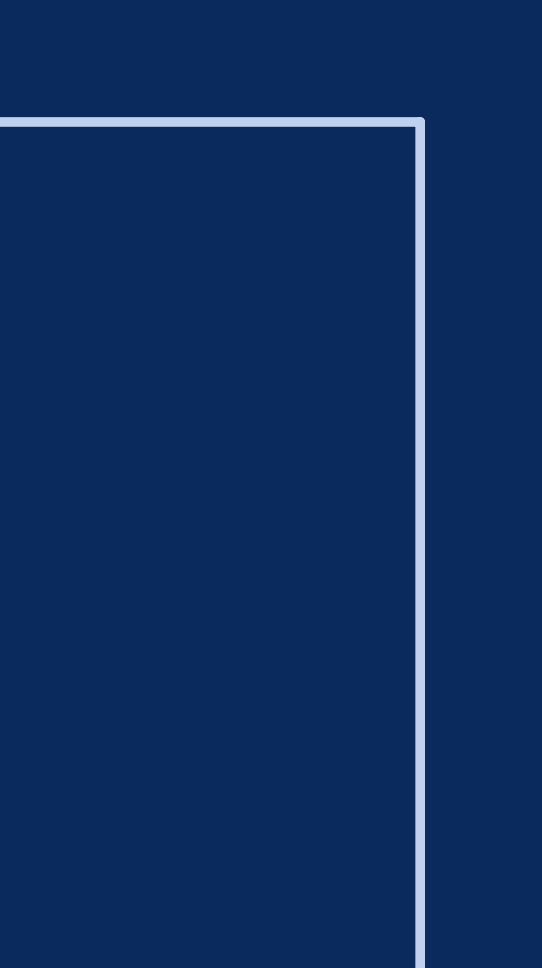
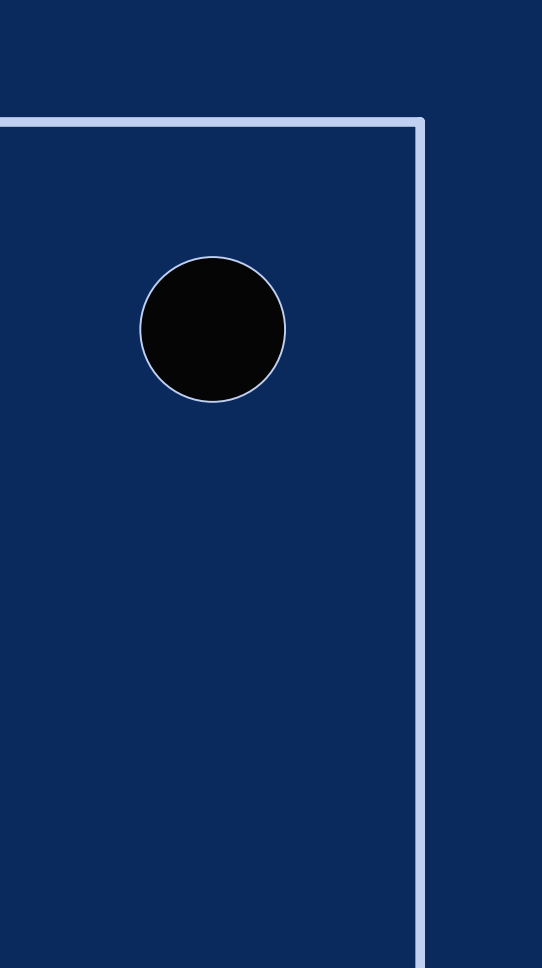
part: none -> (212, 329)

